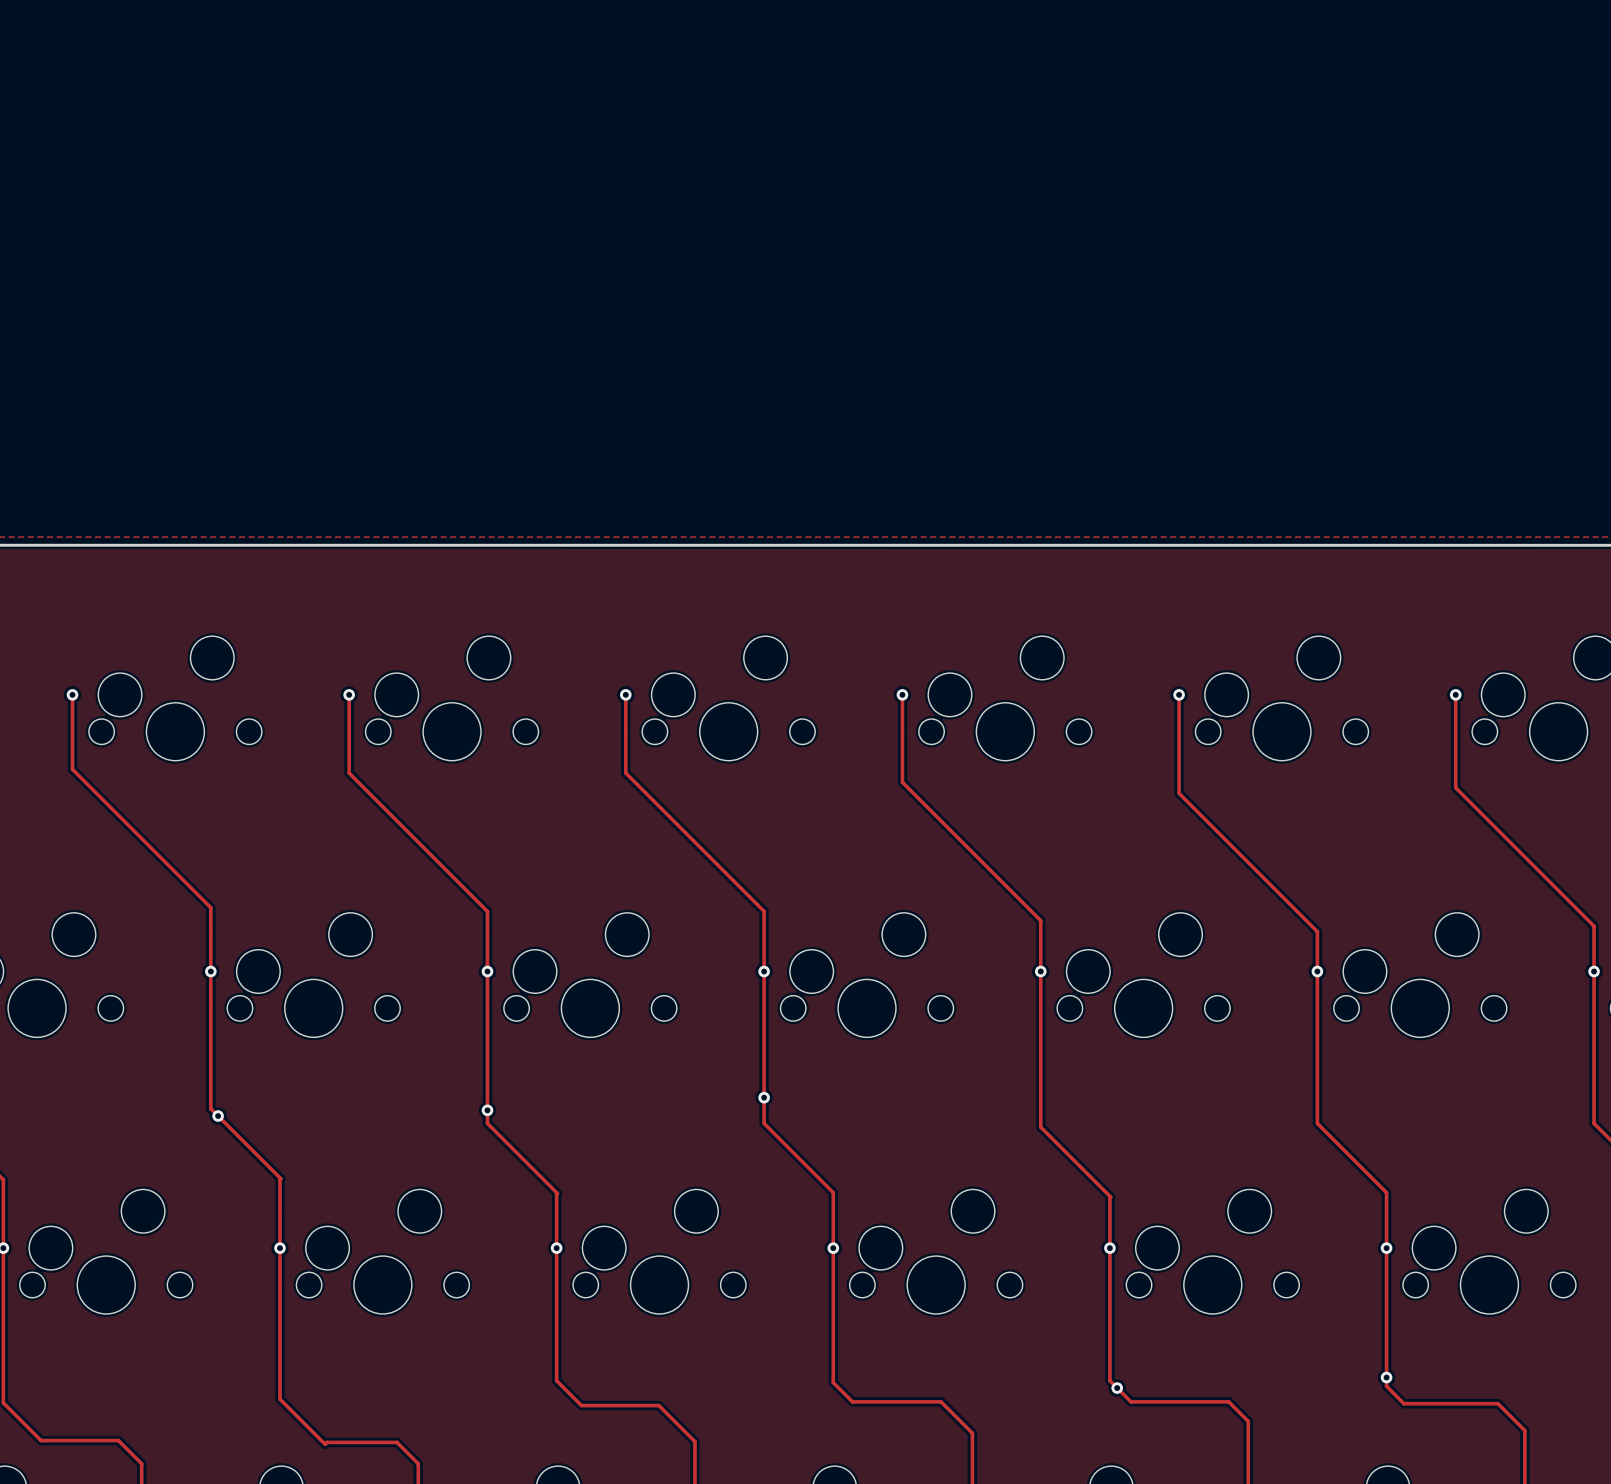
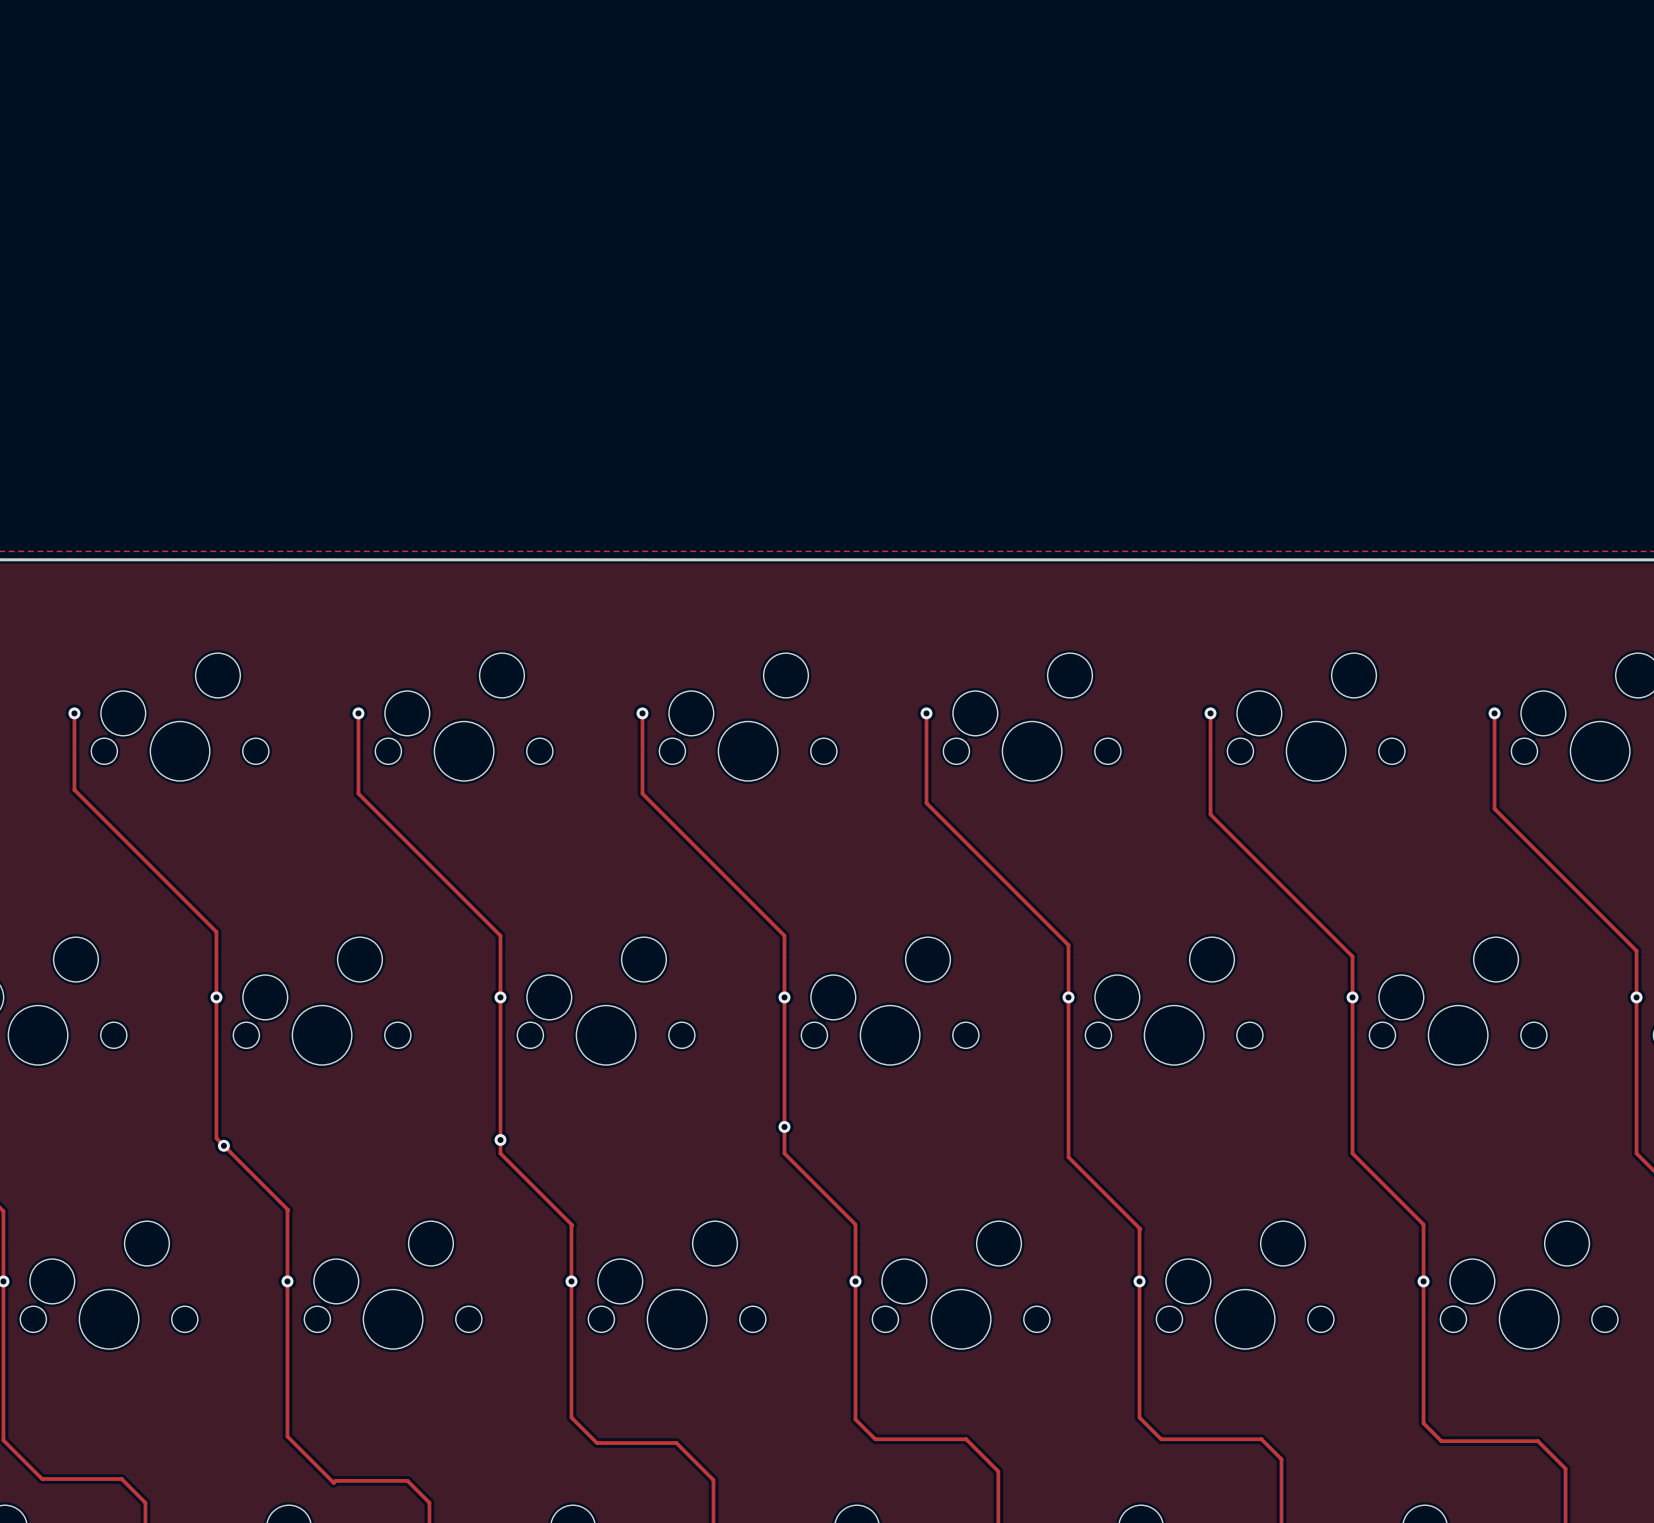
via: (1386, 1377) -> none
via: (1117, 1388) -> none

